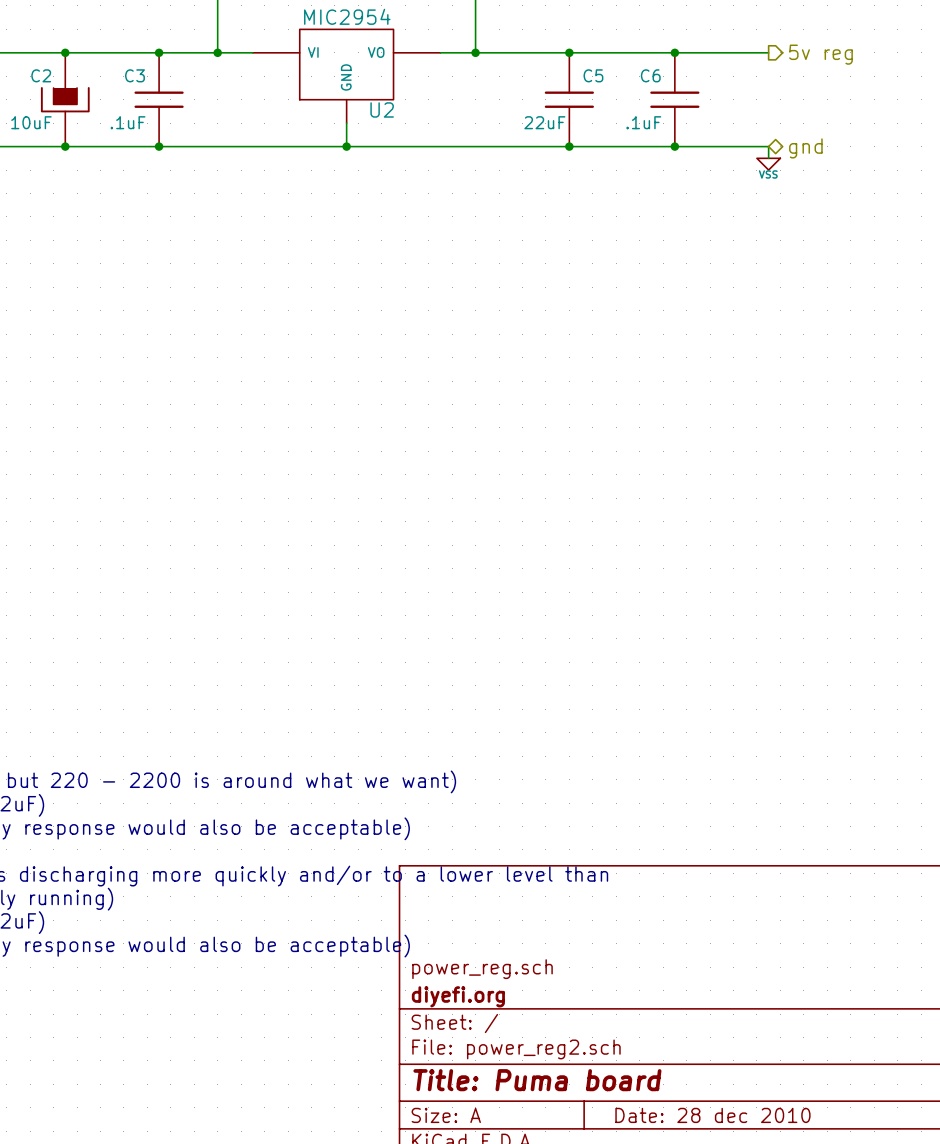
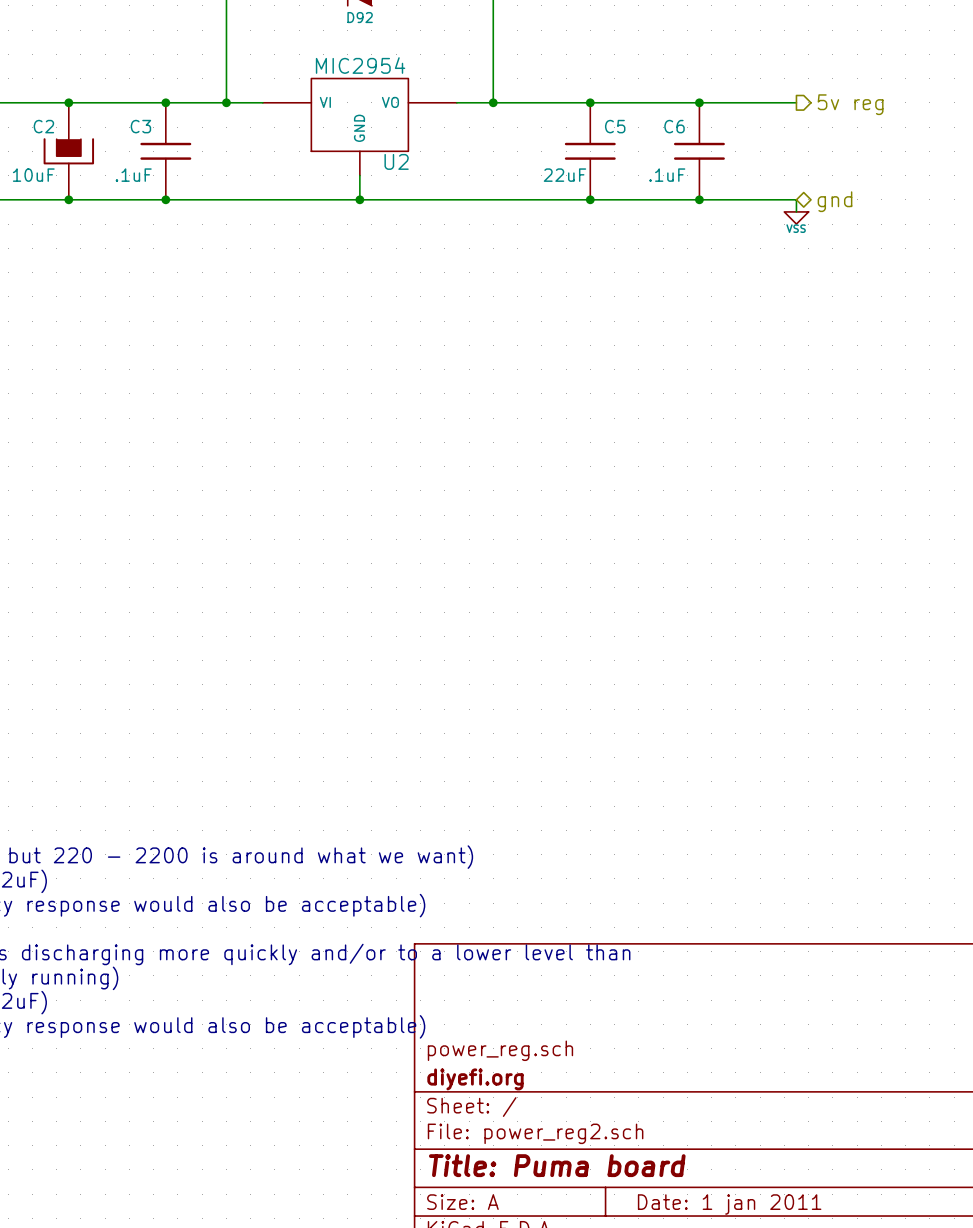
title block: Date: 28 dec 2010 (712, 1115) -> Date: 1 jan 2011 (729, 1204)

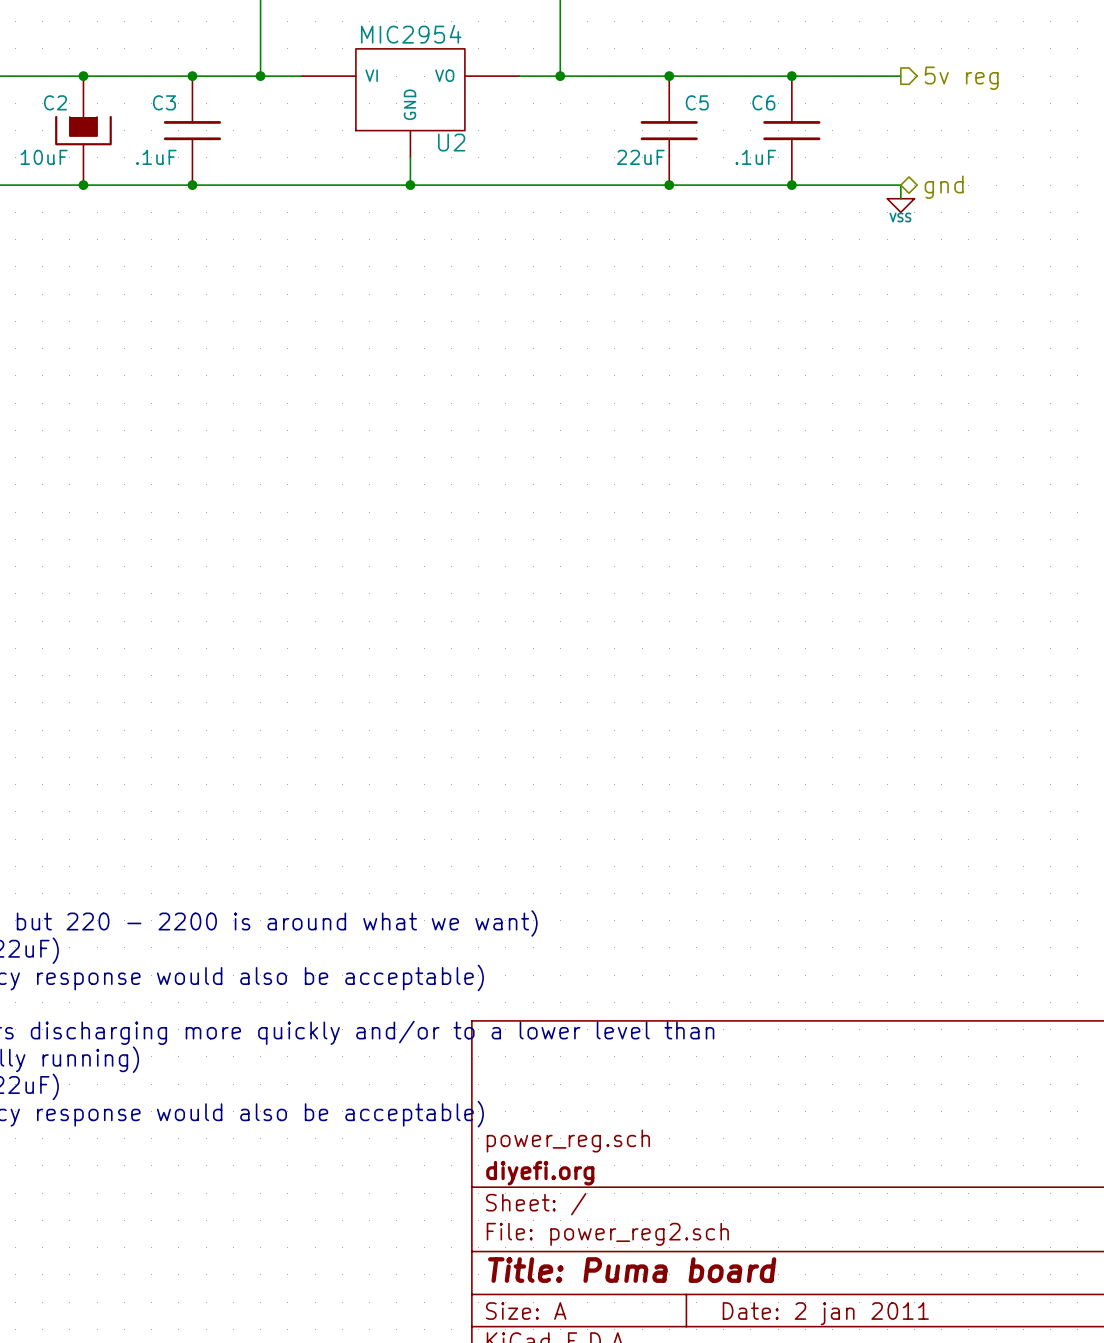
title block: Date: 1 jan 2011 (729, 1204) -> Date: 2 jan 2011 (825, 1313)

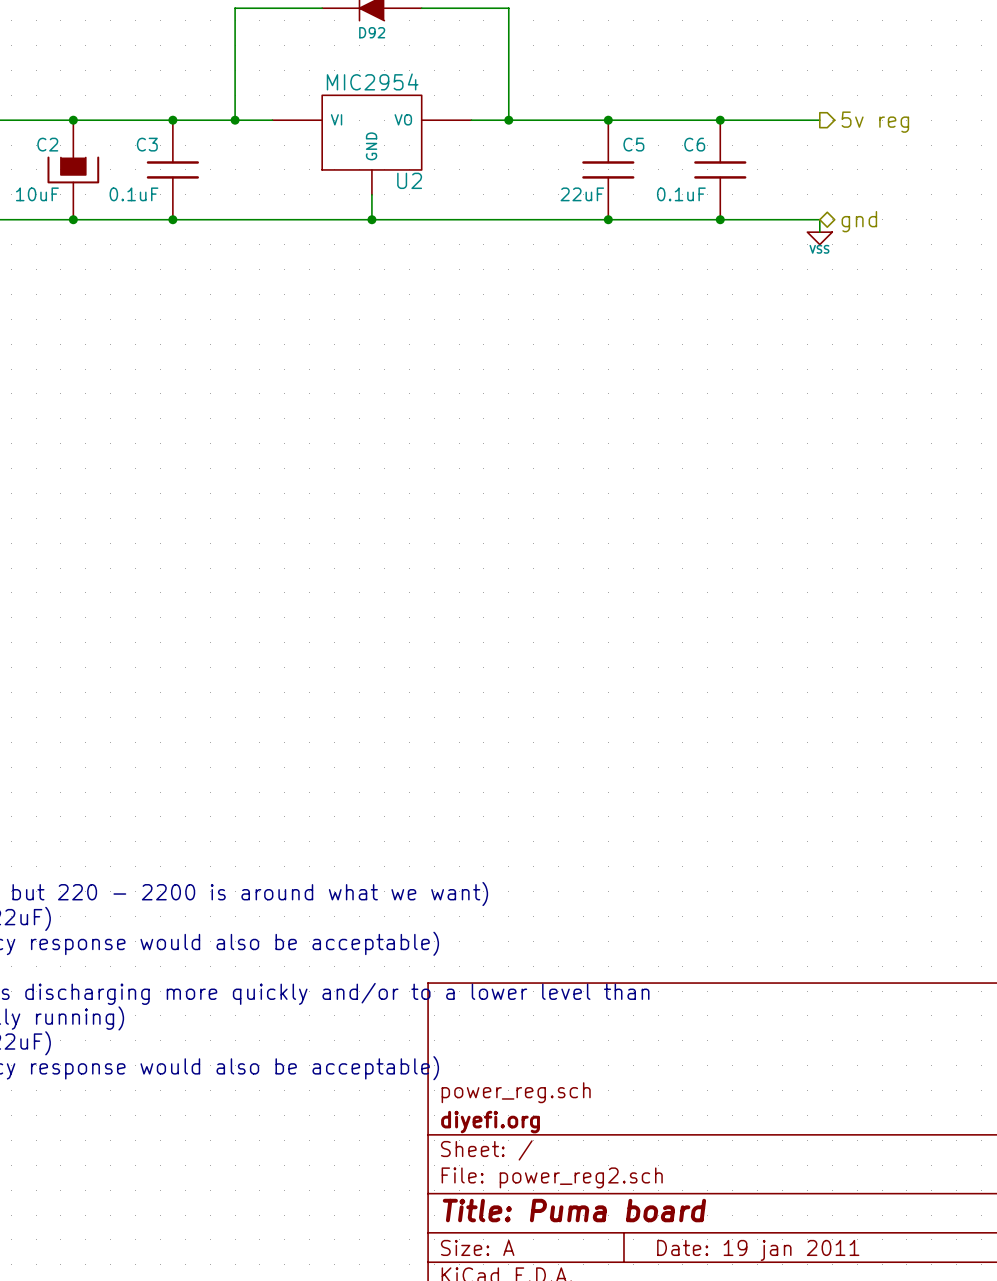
C3 value: .1uF (156, 157) -> 0.1uF (133, 194)
C6 value: .1uF (755, 157) -> 0.1uF (681, 194)
title block: Date: 2 jan 2011 (825, 1313) -> Date: 19 jan 2011 (758, 1250)

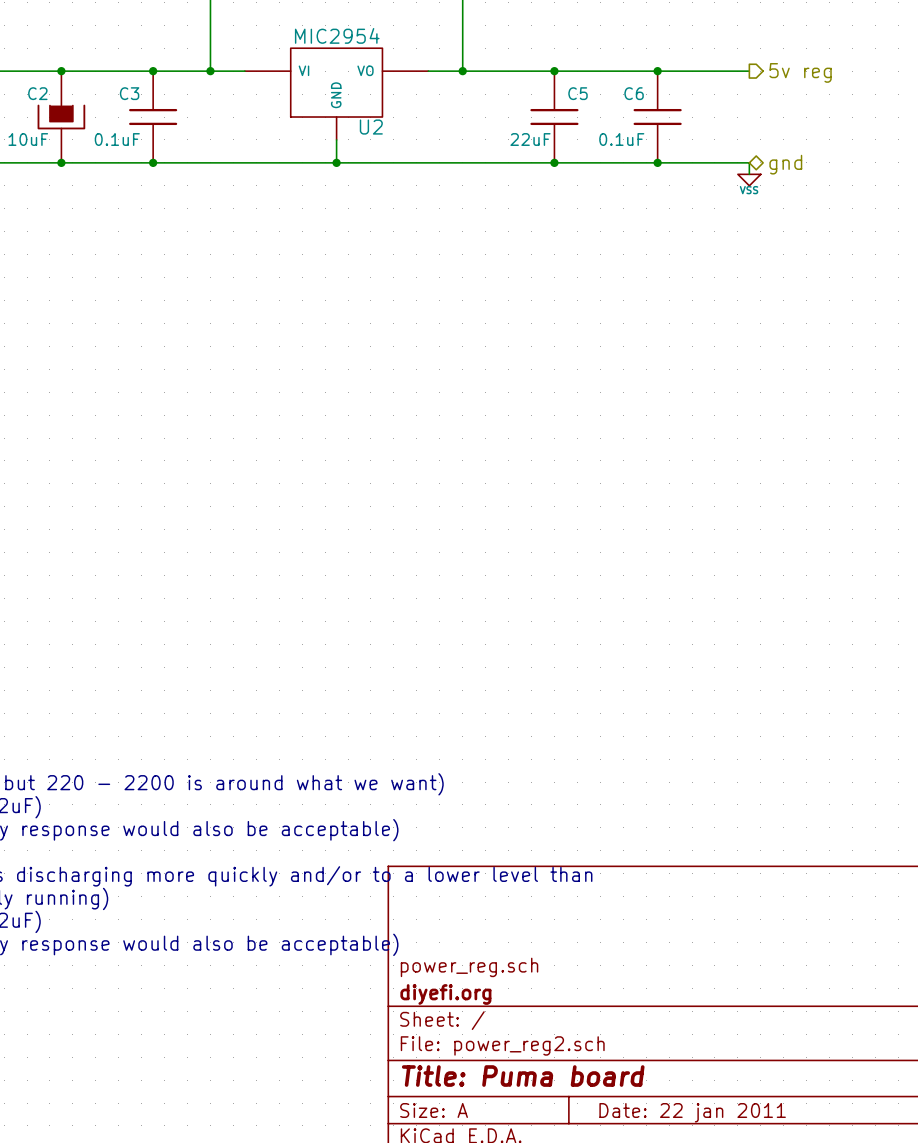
title block: Date: 19 jan 2011 (758, 1250) -> Date: 22 jan 2011 (692, 1112)

